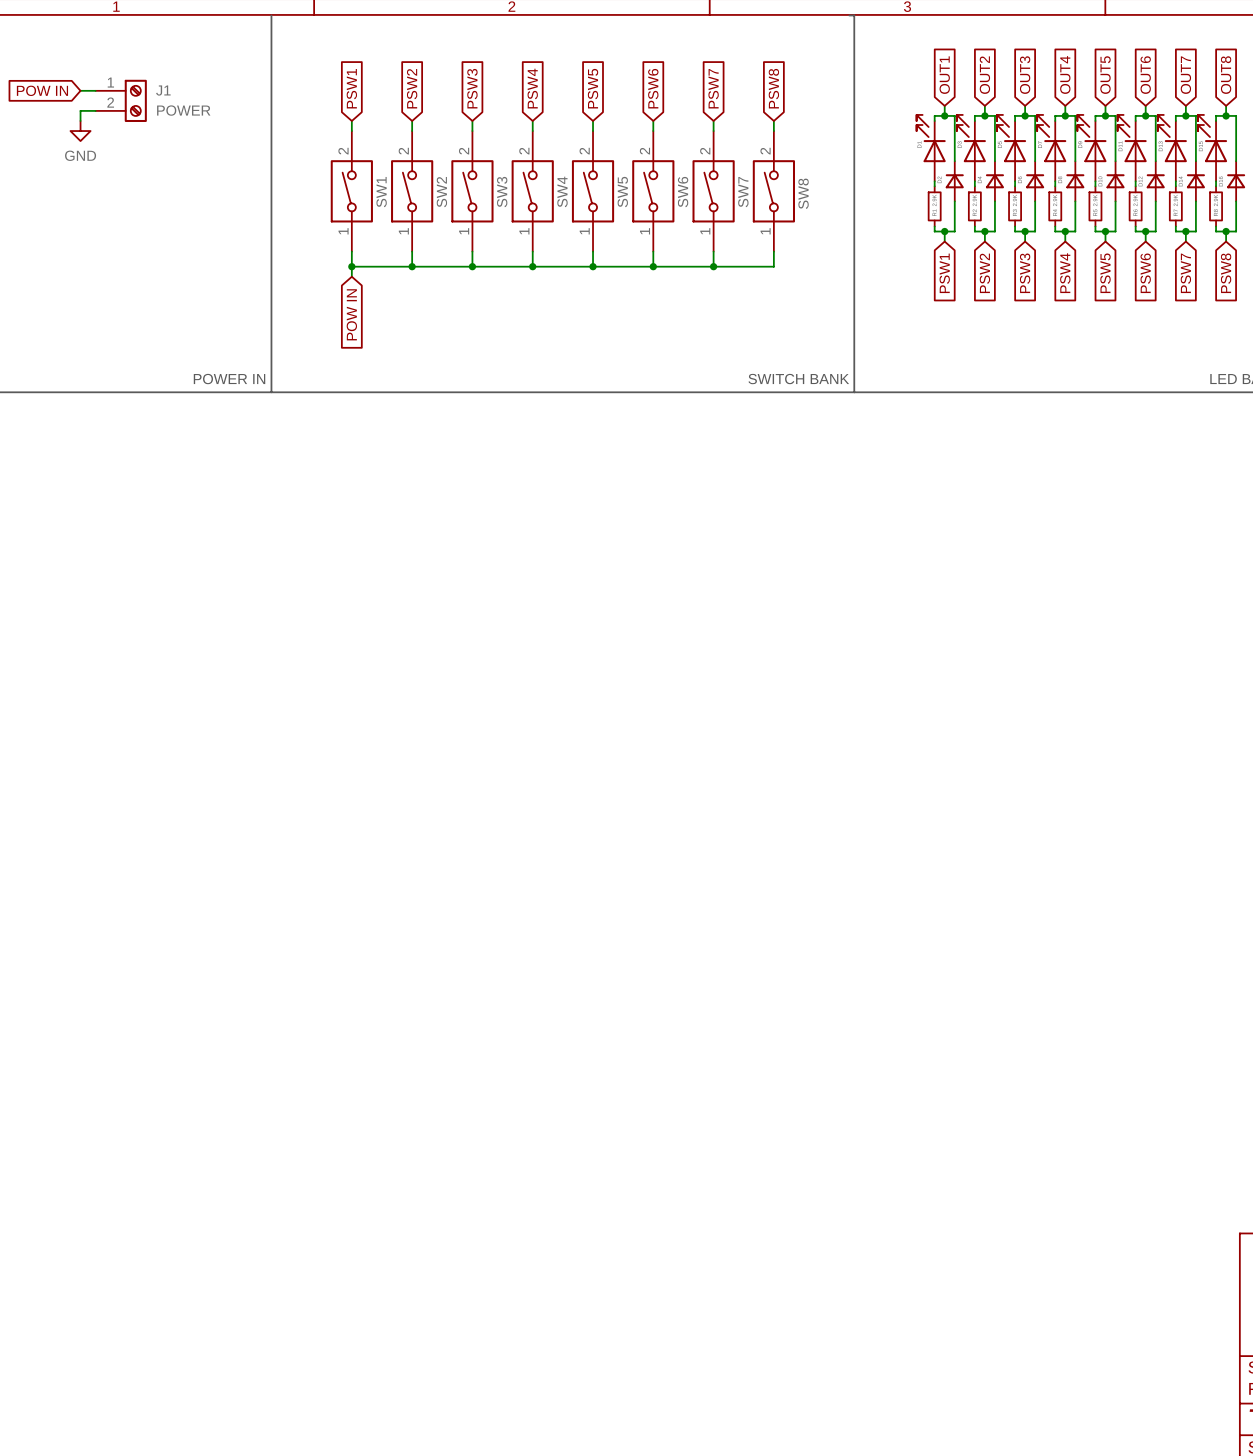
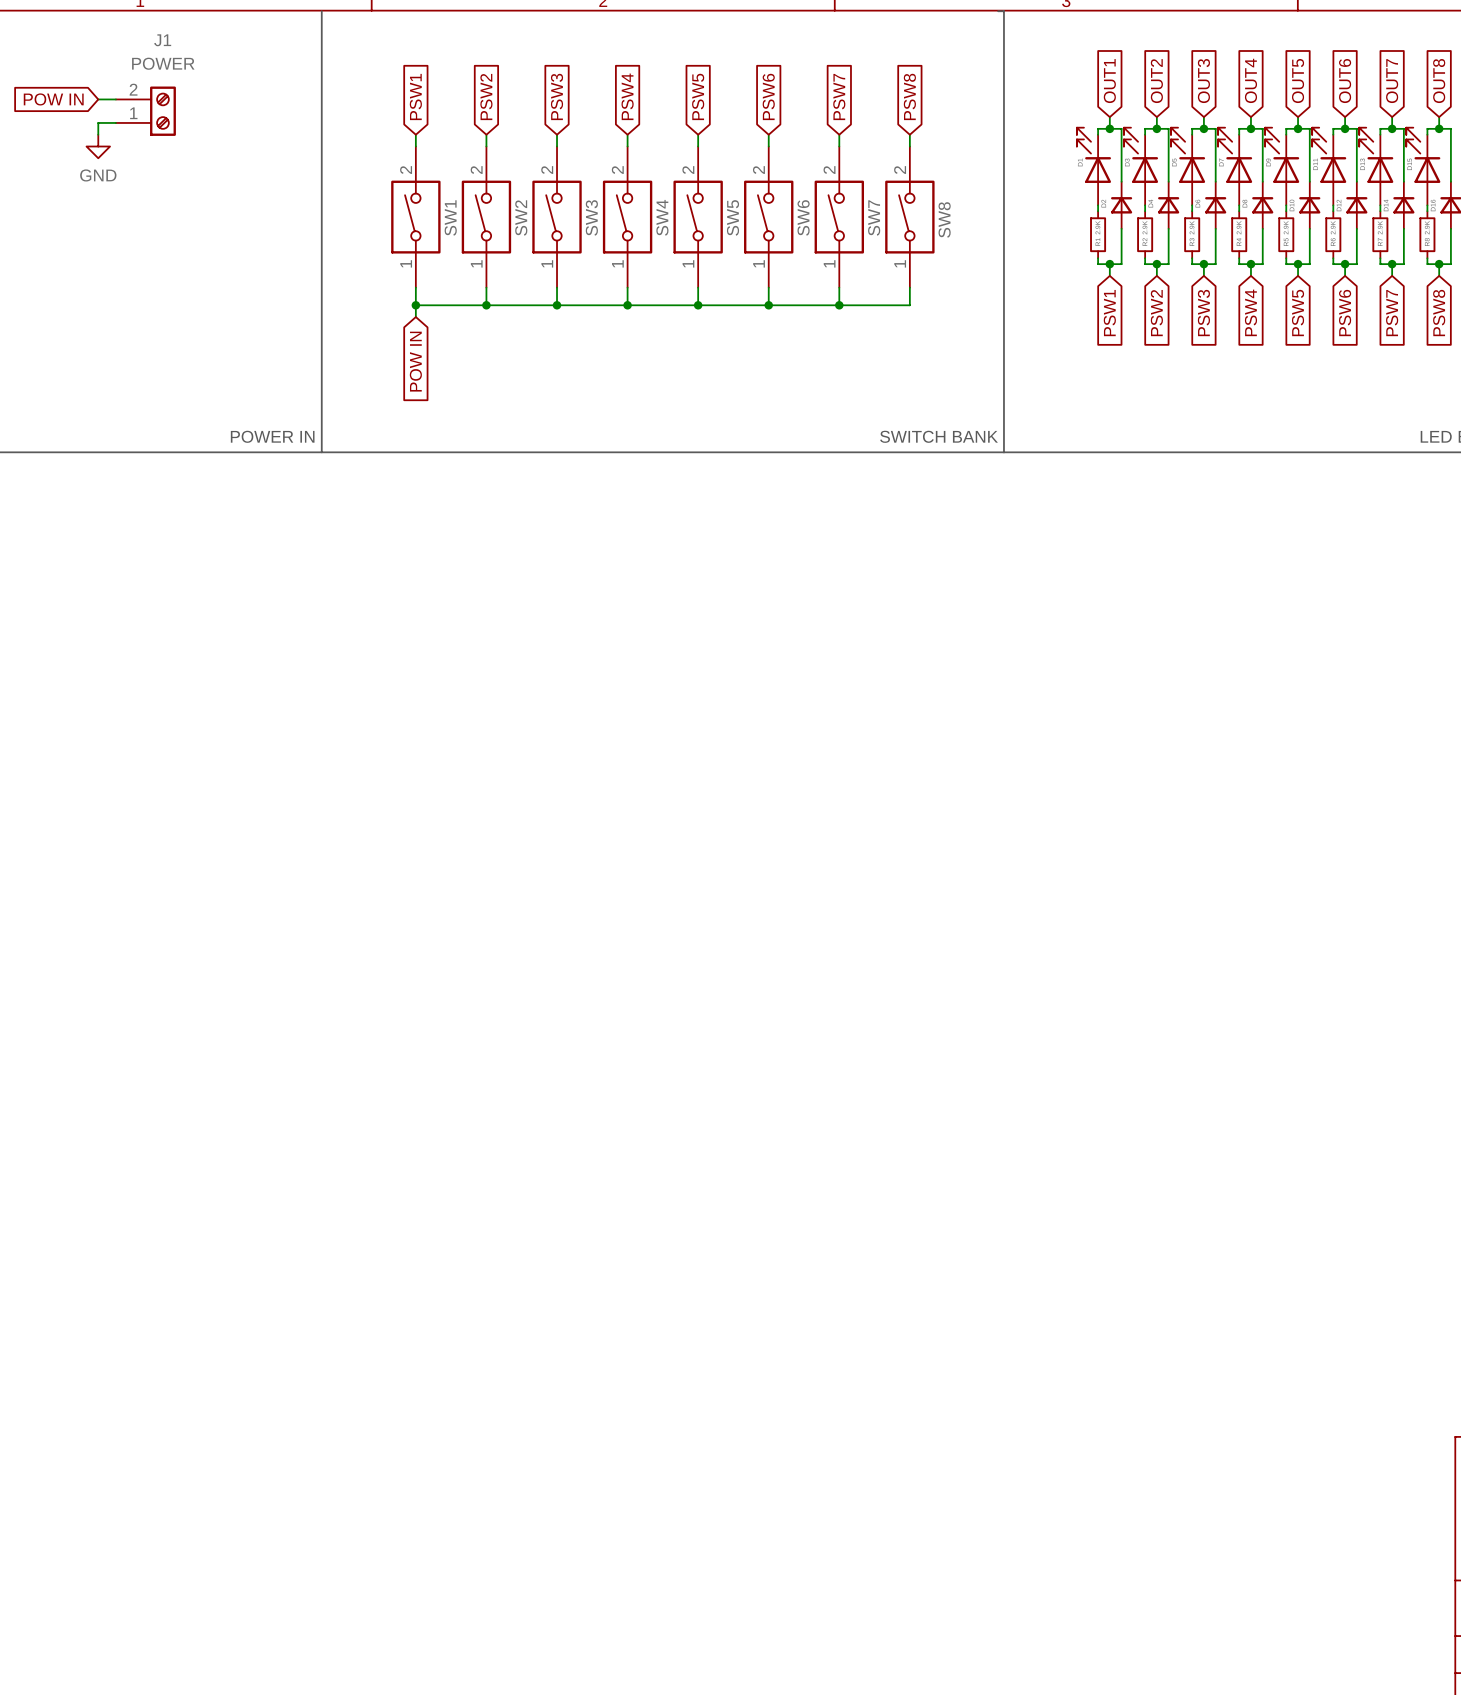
J1 name position: J1 (163, 90) -> J1 (162, 40)
J1 flip: as is (135, 100) -> up-down (162, 111)
J1 value position: POWER (183, 110) -> POWER (163, 63)

